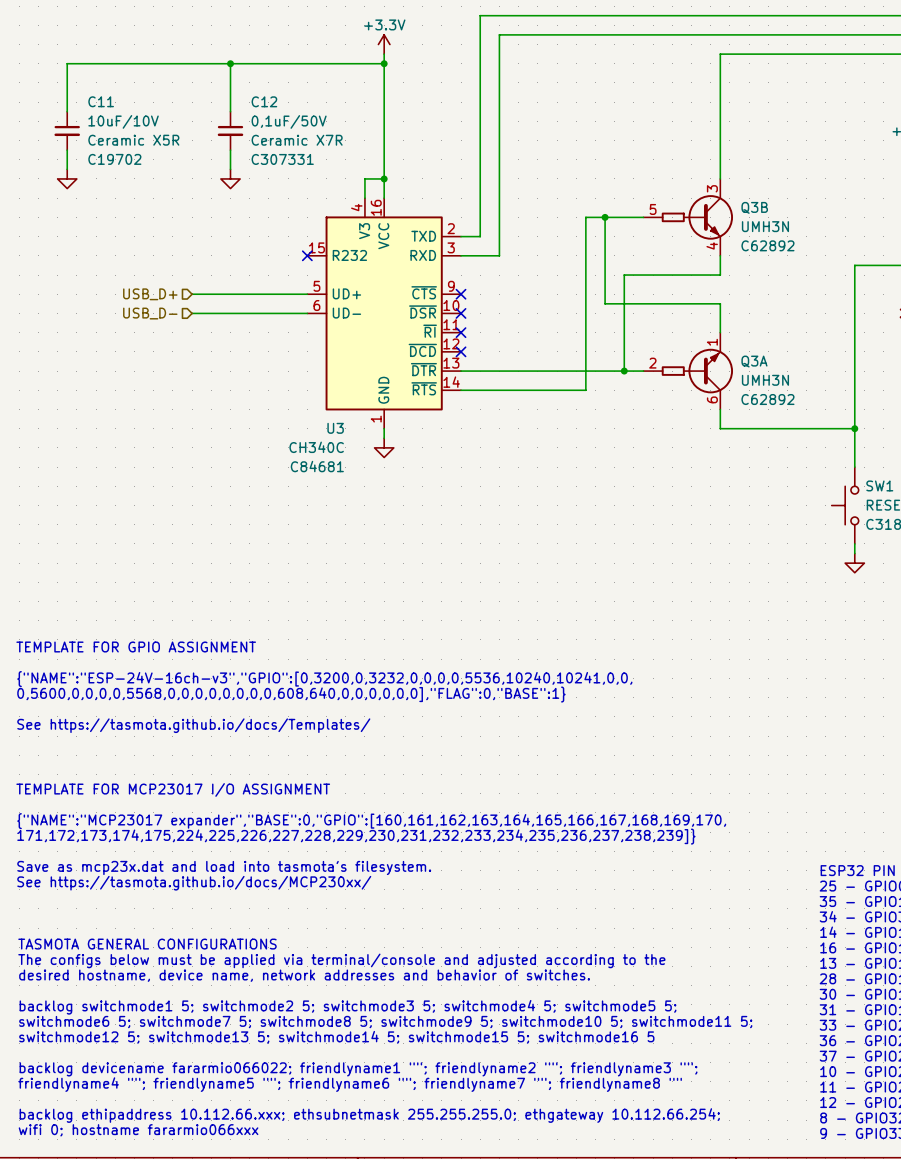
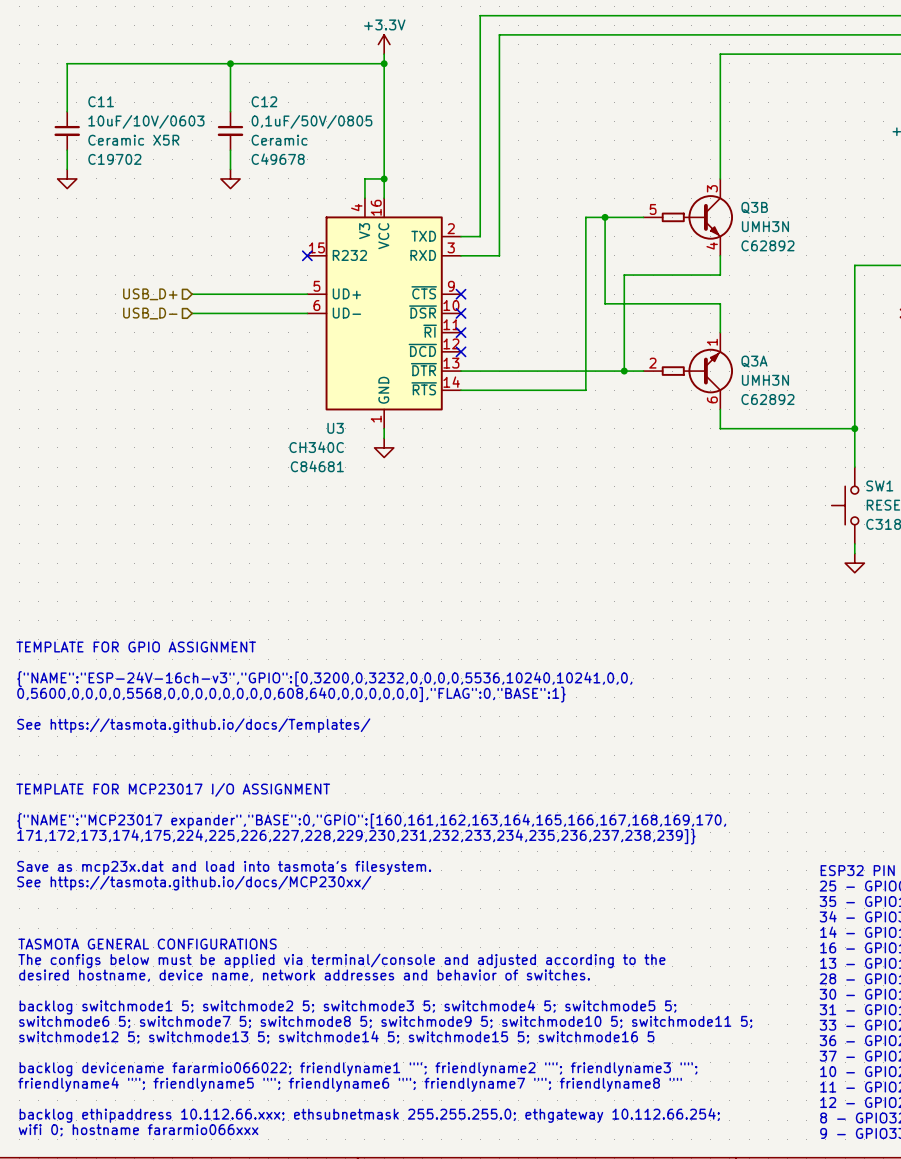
C11 value: 10uF/10V (123, 121) -> 10uF/10V/0603 (146, 121)
C12 value: 0,1uF/50V (289, 121) -> 0,1uF/50V/0805 (311, 121)
C12 text: Ceramic X7R (297, 140) -> Ceramic (279, 140)
C12 text: C307331 (282, 159) -> C49678 (278, 159)

